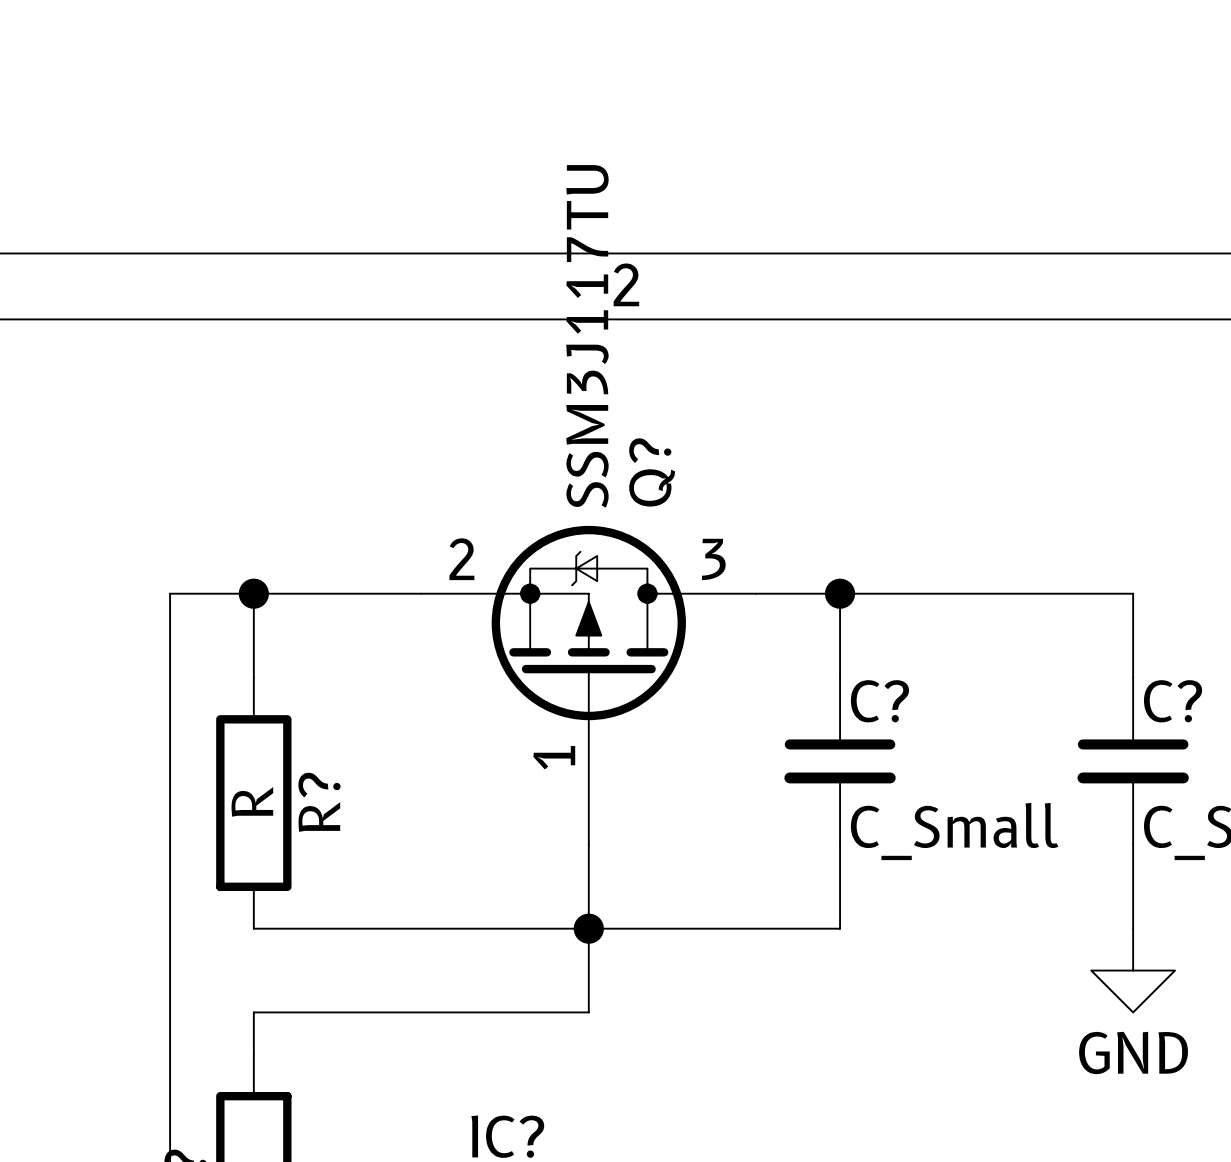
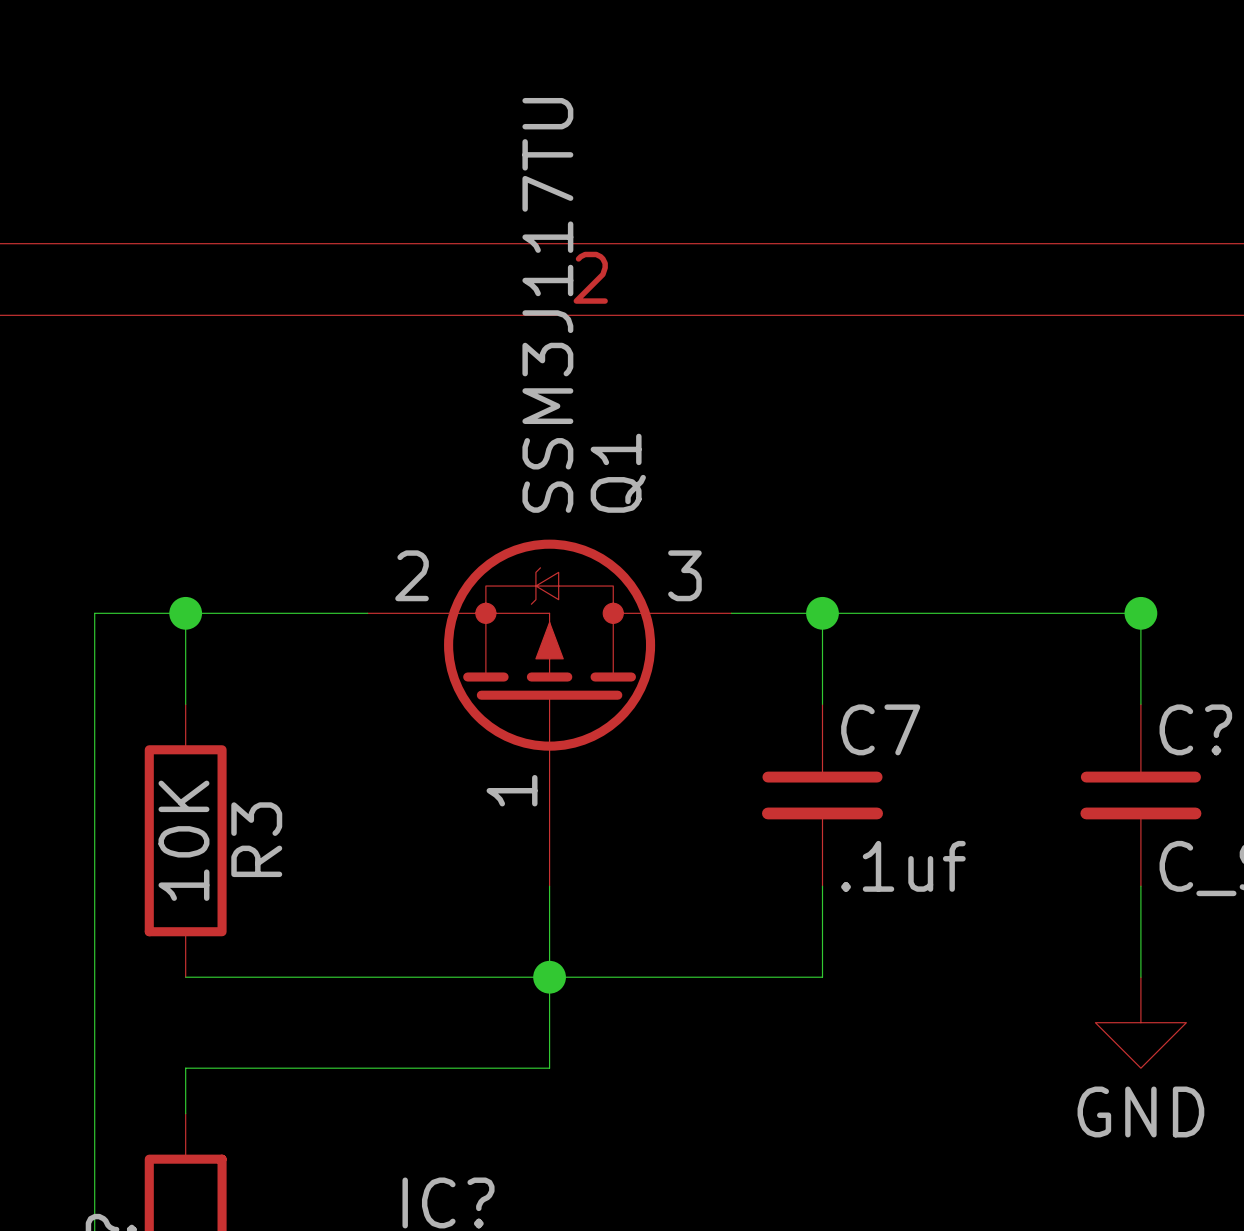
Q? name: Q? (652, 472) -> Q1 (618, 473)
junction: none -> (1140, 613)
C? name: C? (879, 701) -> C7 (880, 729)
R? value: R (252, 801) -> 10K (183, 840)
R? name: R? (319, 802) -> R3 (256, 839)
C? value: C_Small (954, 831) -> .1uf (903, 866)

